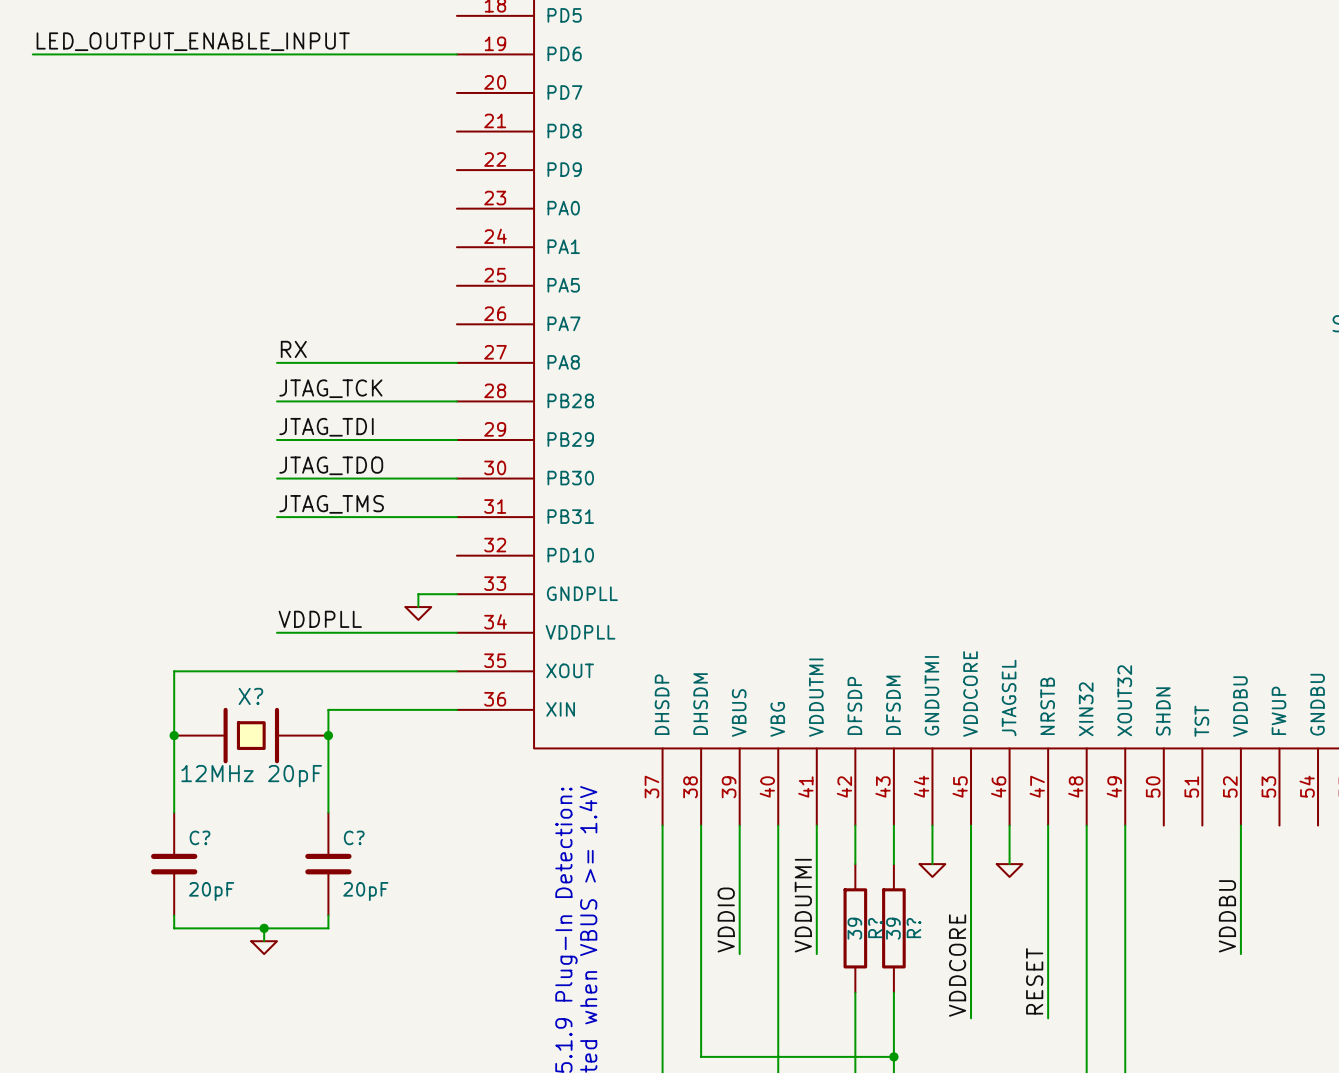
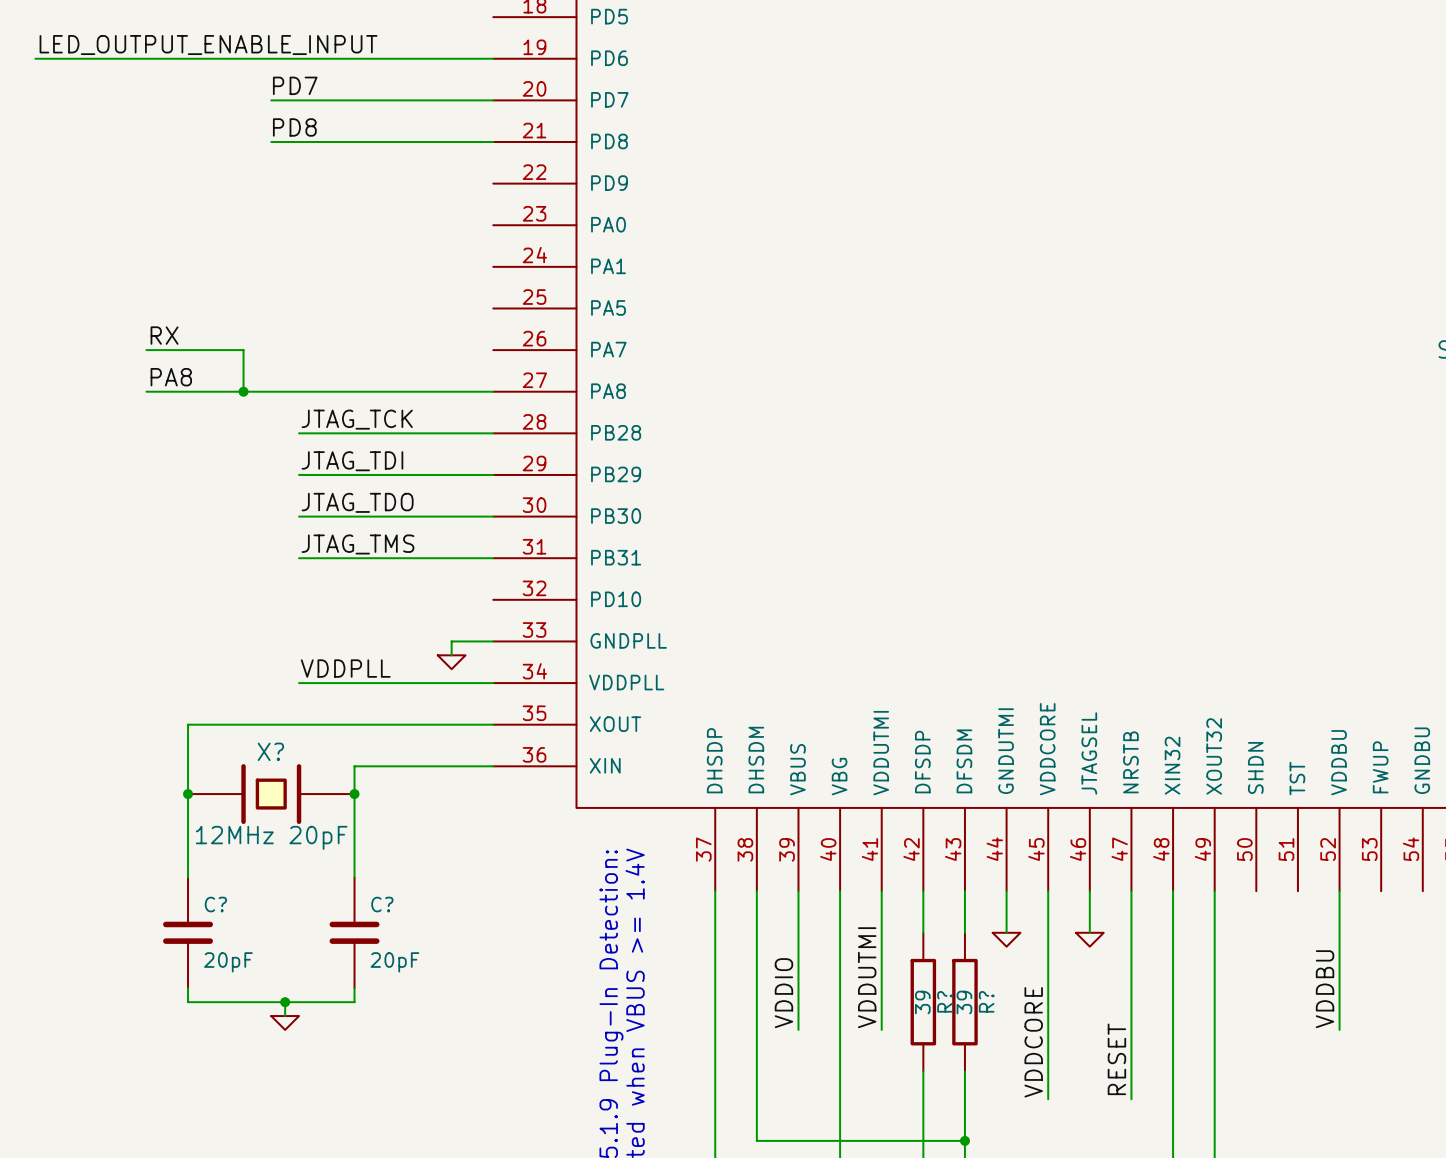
label: none -> PD7 (295, 85)
wire: none -> (271, 100) (493, 100)
label: none -> PD8 (294, 127)
wire: none -> (271, 141) (493, 141)
wire: none -> (146, 350) (243, 350) (243, 391)
label: none -> PA8 (171, 377)
label position: RX (293, 349) -> RX (164, 335)
wire: none -> (146, 391) (299, 391)
junction: none -> (243, 391)

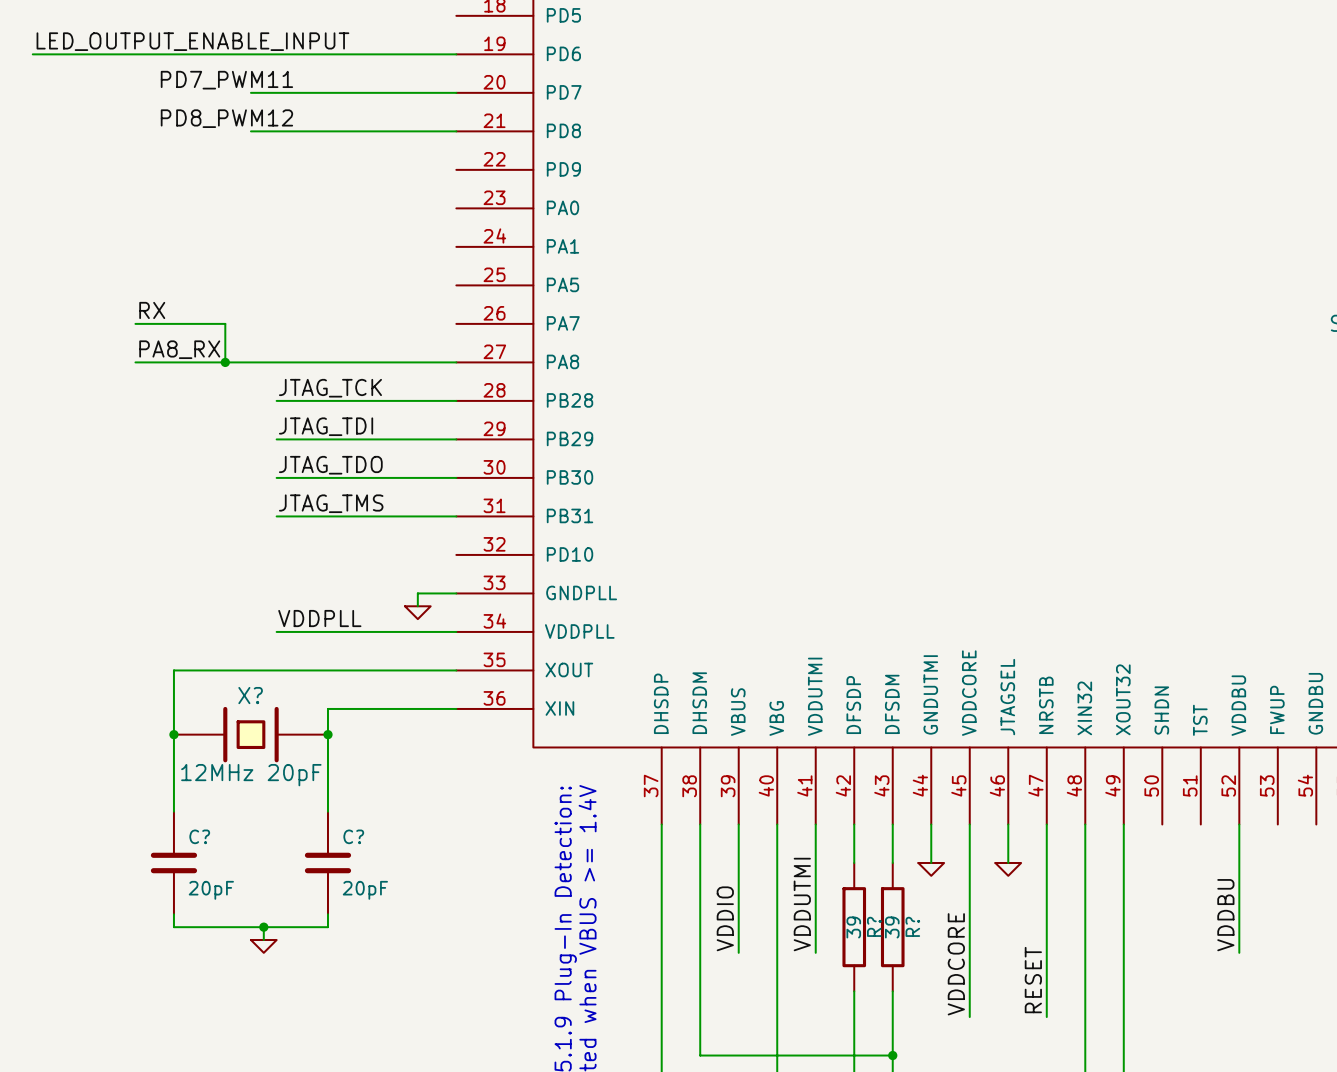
label: PD7 (295, 85) -> PD7_PWM11 (226, 80)
label: PD8 (294, 127) -> PD8_PWM12 (226, 118)
label: PA8 (171, 377) -> PA8_RX (179, 349)

